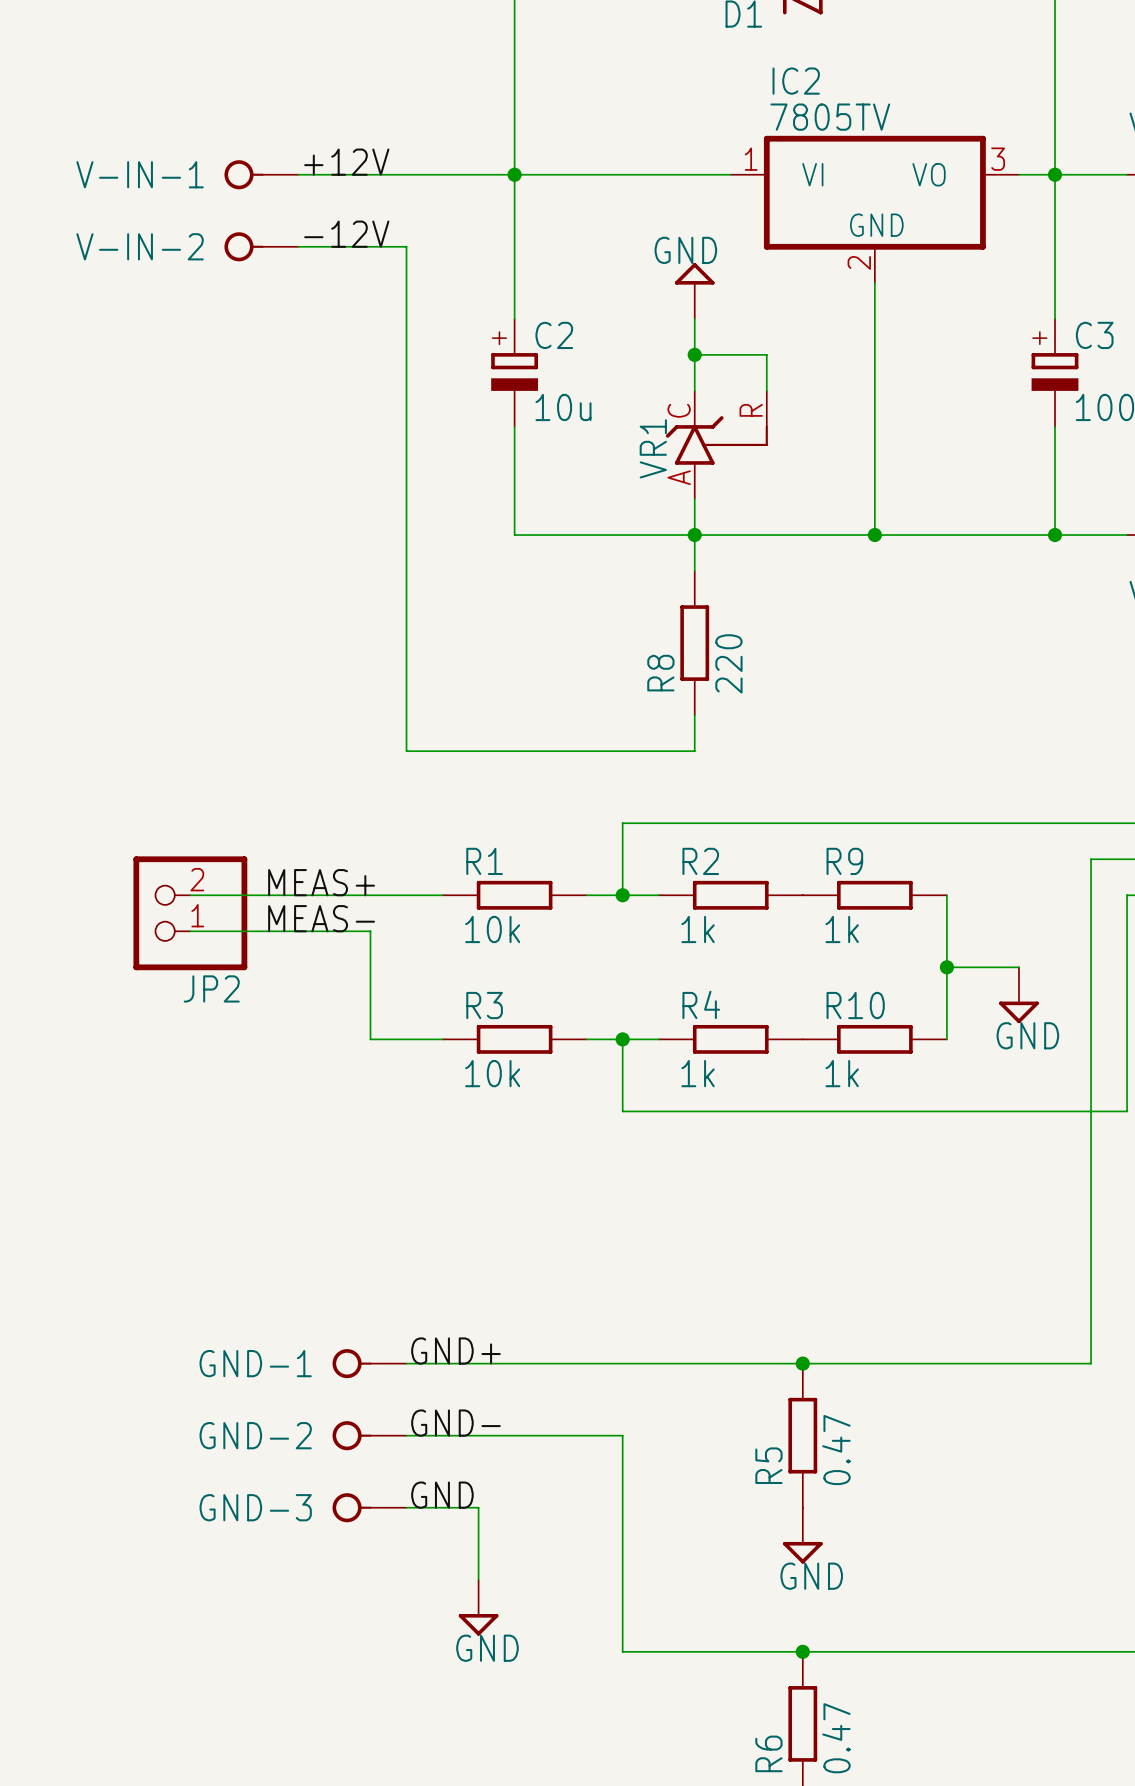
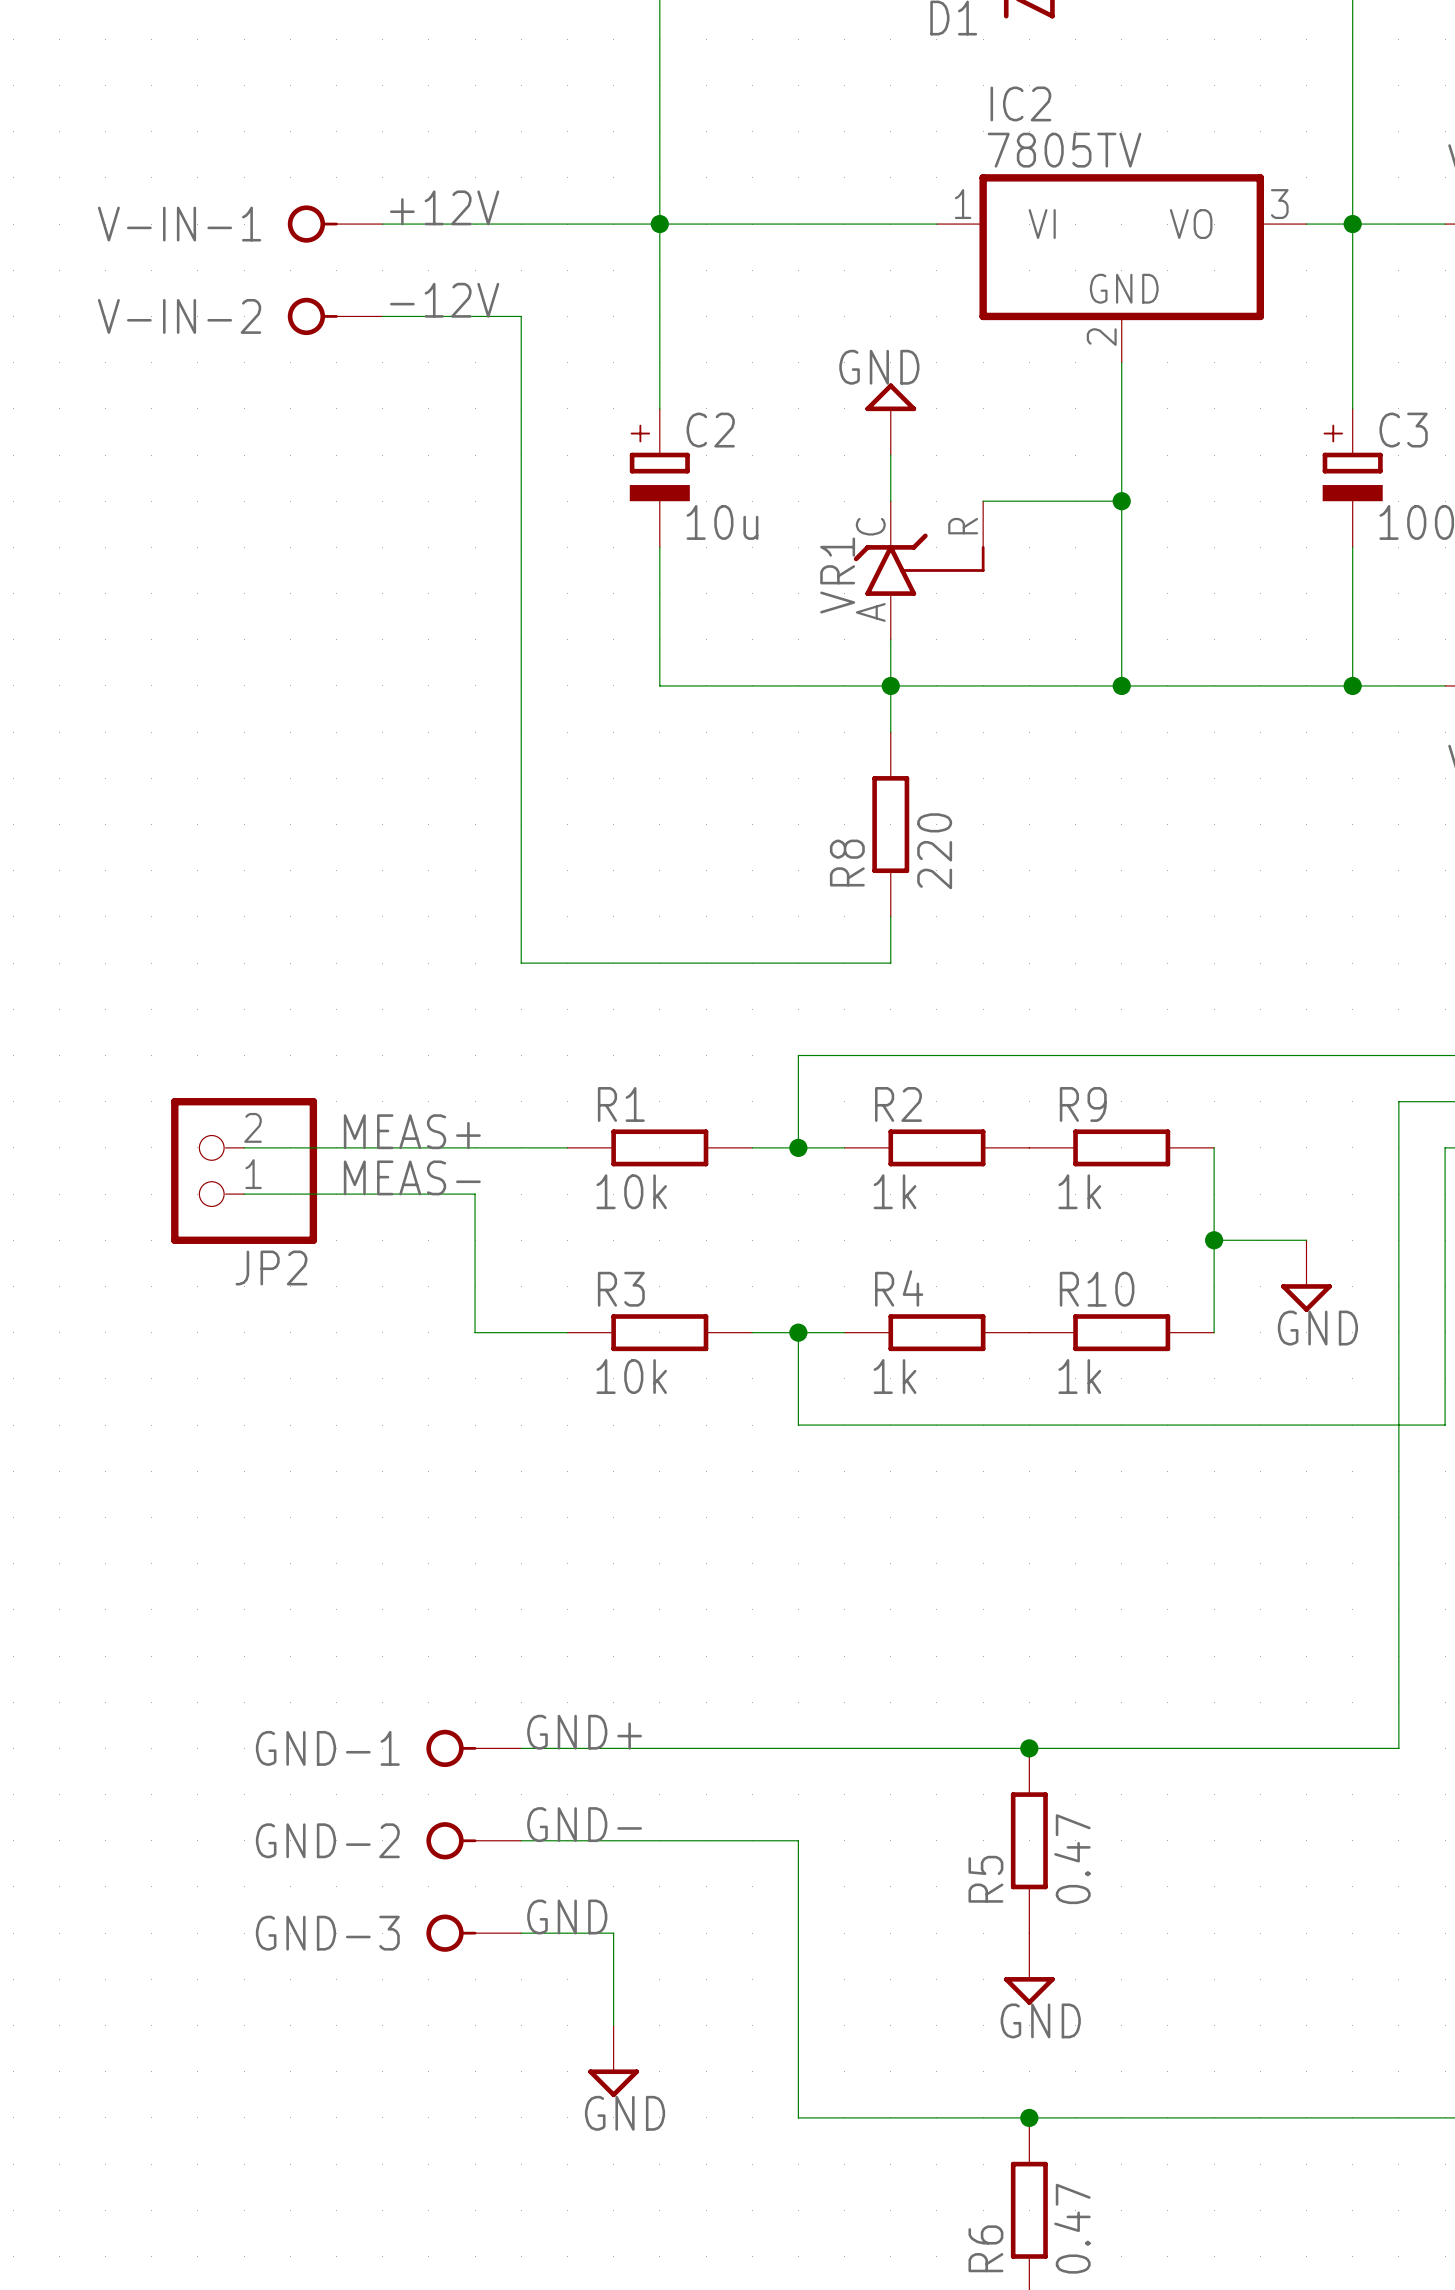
power symbol position: GND (694, 290) -> GND (890, 419)
wire: (694, 318) (694, 354) (766, 354) (766, 390) -> (1121, 501) (983, 501)
junction: (694, 354) -> none
junction: none -> (1121, 501)

